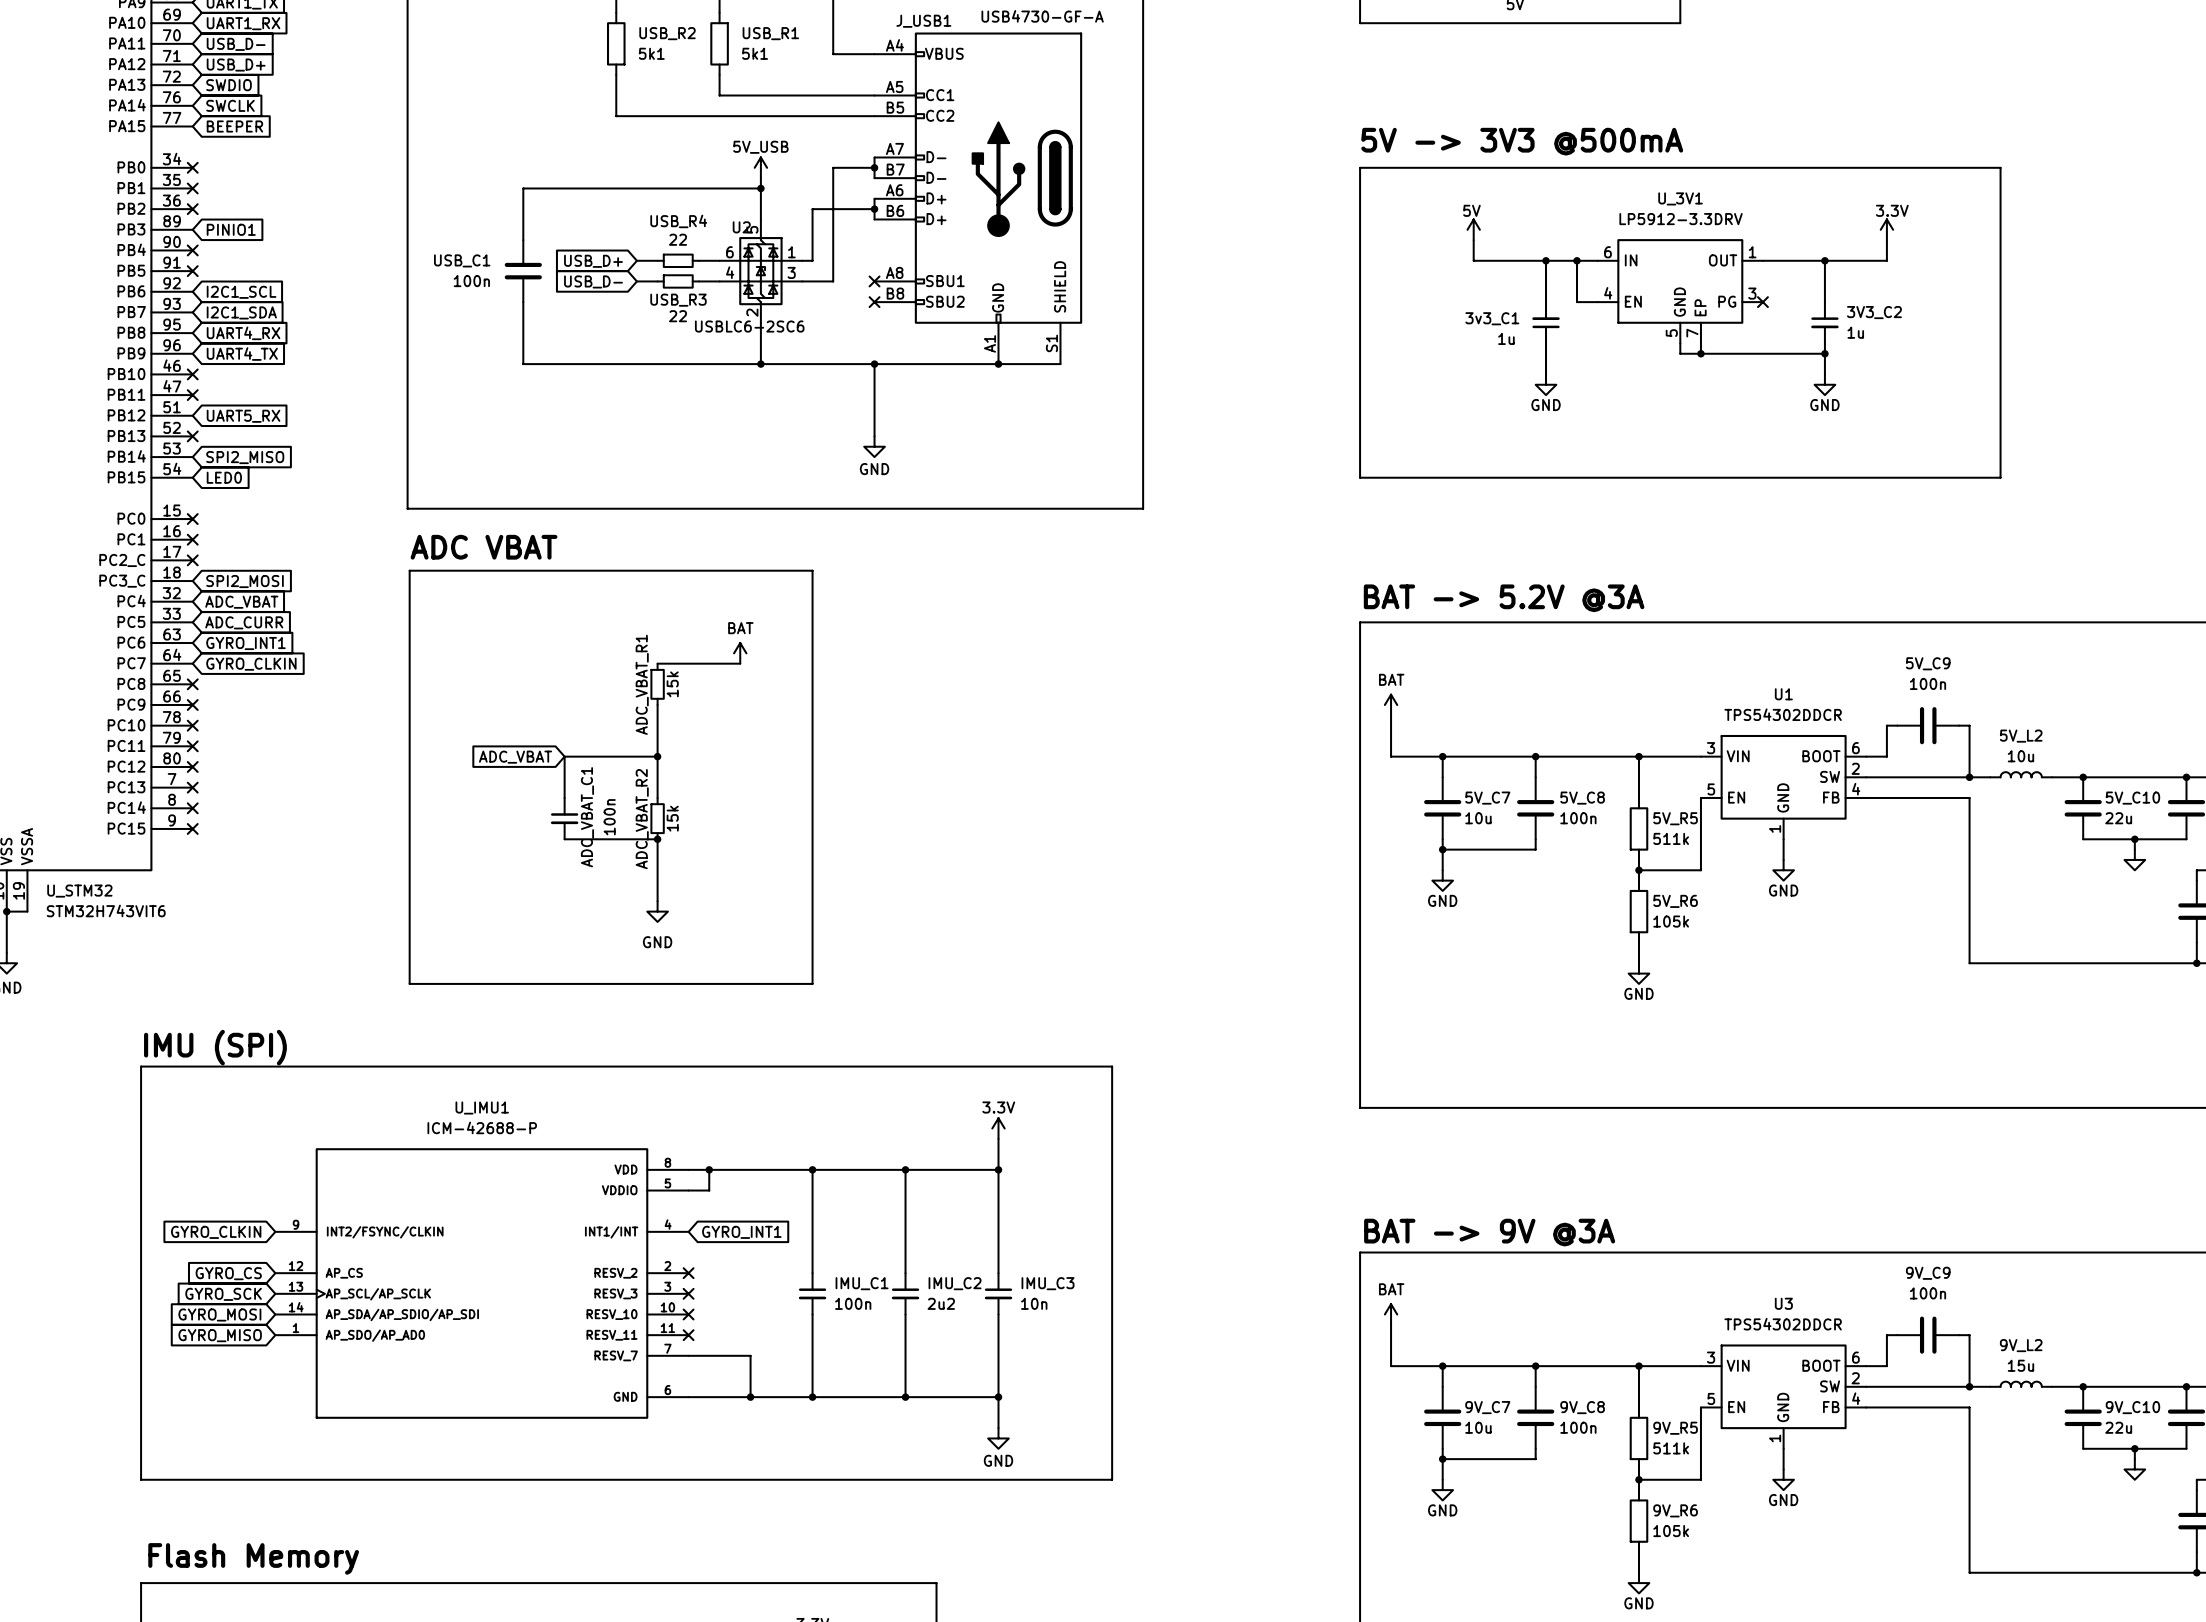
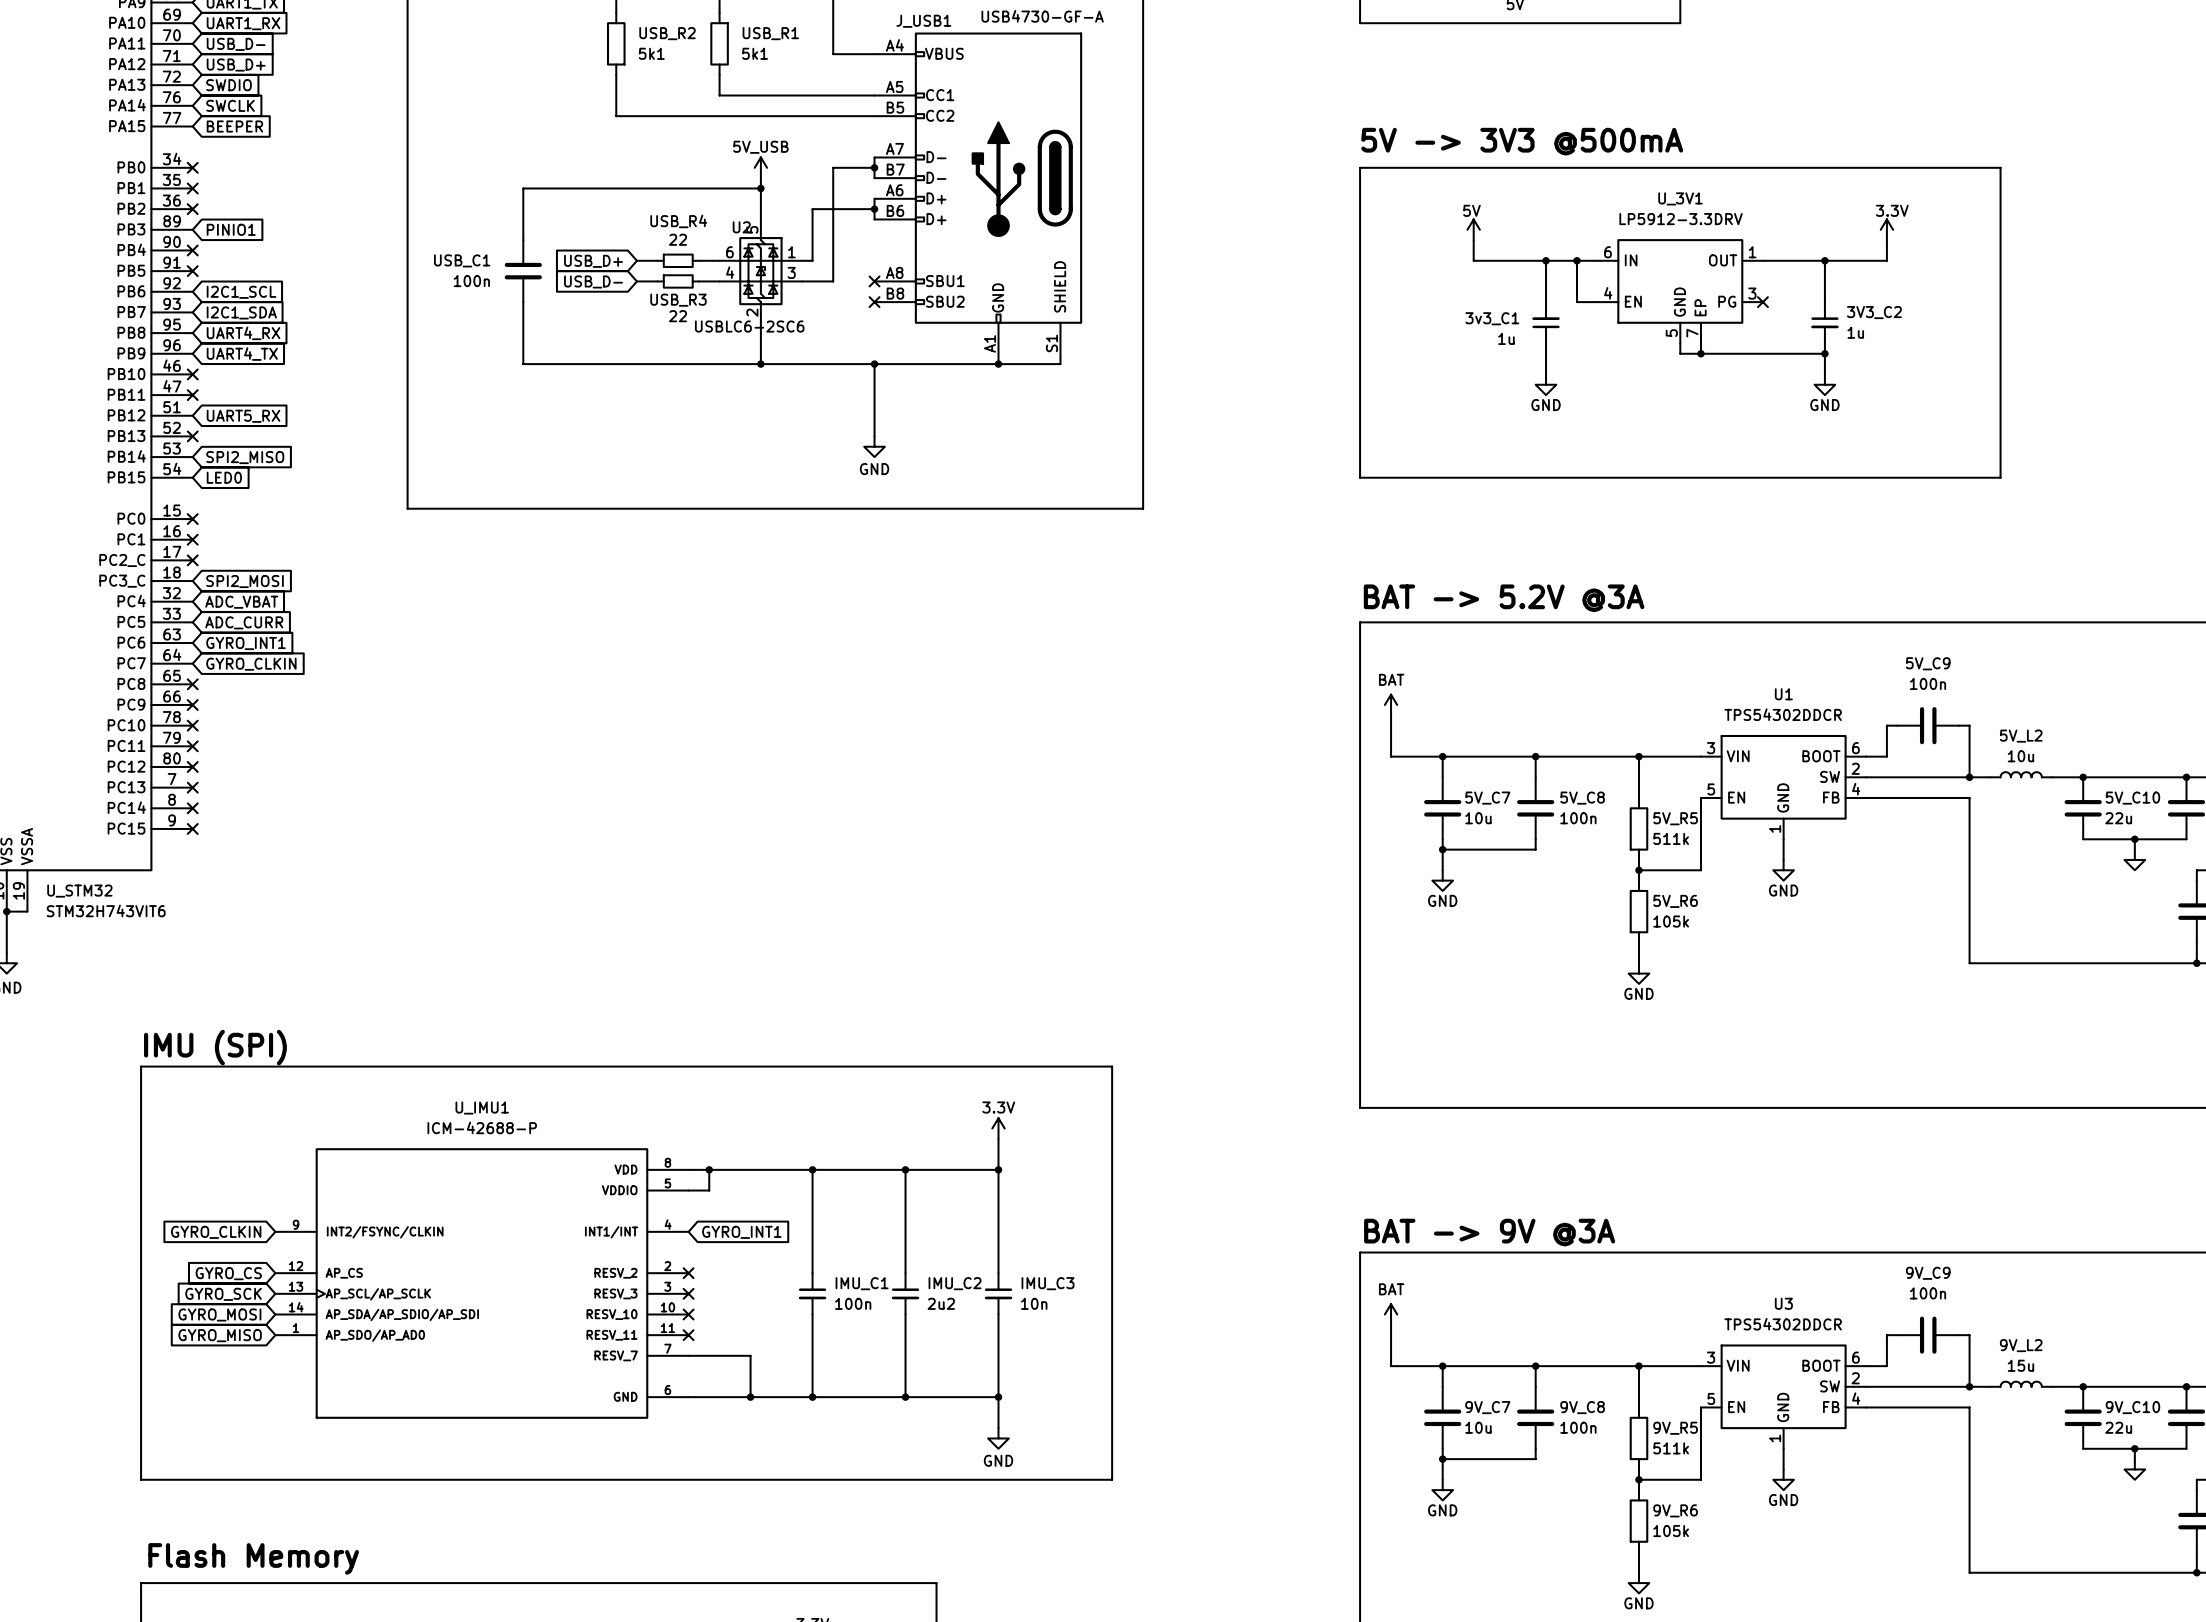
text: ADC VBAT (484, 547) -> none
line: (409, 570) (812, 570) (812, 983) (409, 983) (409, 570) -> none
power symbol: BAT (740, 653) -> none
wire: (657, 663) (740, 663) -> none
ADC_VBAT_R1: 15k (657, 684) -> none
wire: (657, 705) (657, 797) -> none
wire: (657, 756) (564, 756) (564, 797) -> none
junction: (657, 756) -> none
global label: ADC_VBAT (515, 757) -> none
ADC_VBAT_C1: 100n (564, 818) -> none
ADC_VBAT_R2: 15k (657, 818) -> none
wire: (564, 839) (657, 839) (657, 901) -> none
junction: (657, 839) -> none
power symbol: GND (657, 911) -> none

